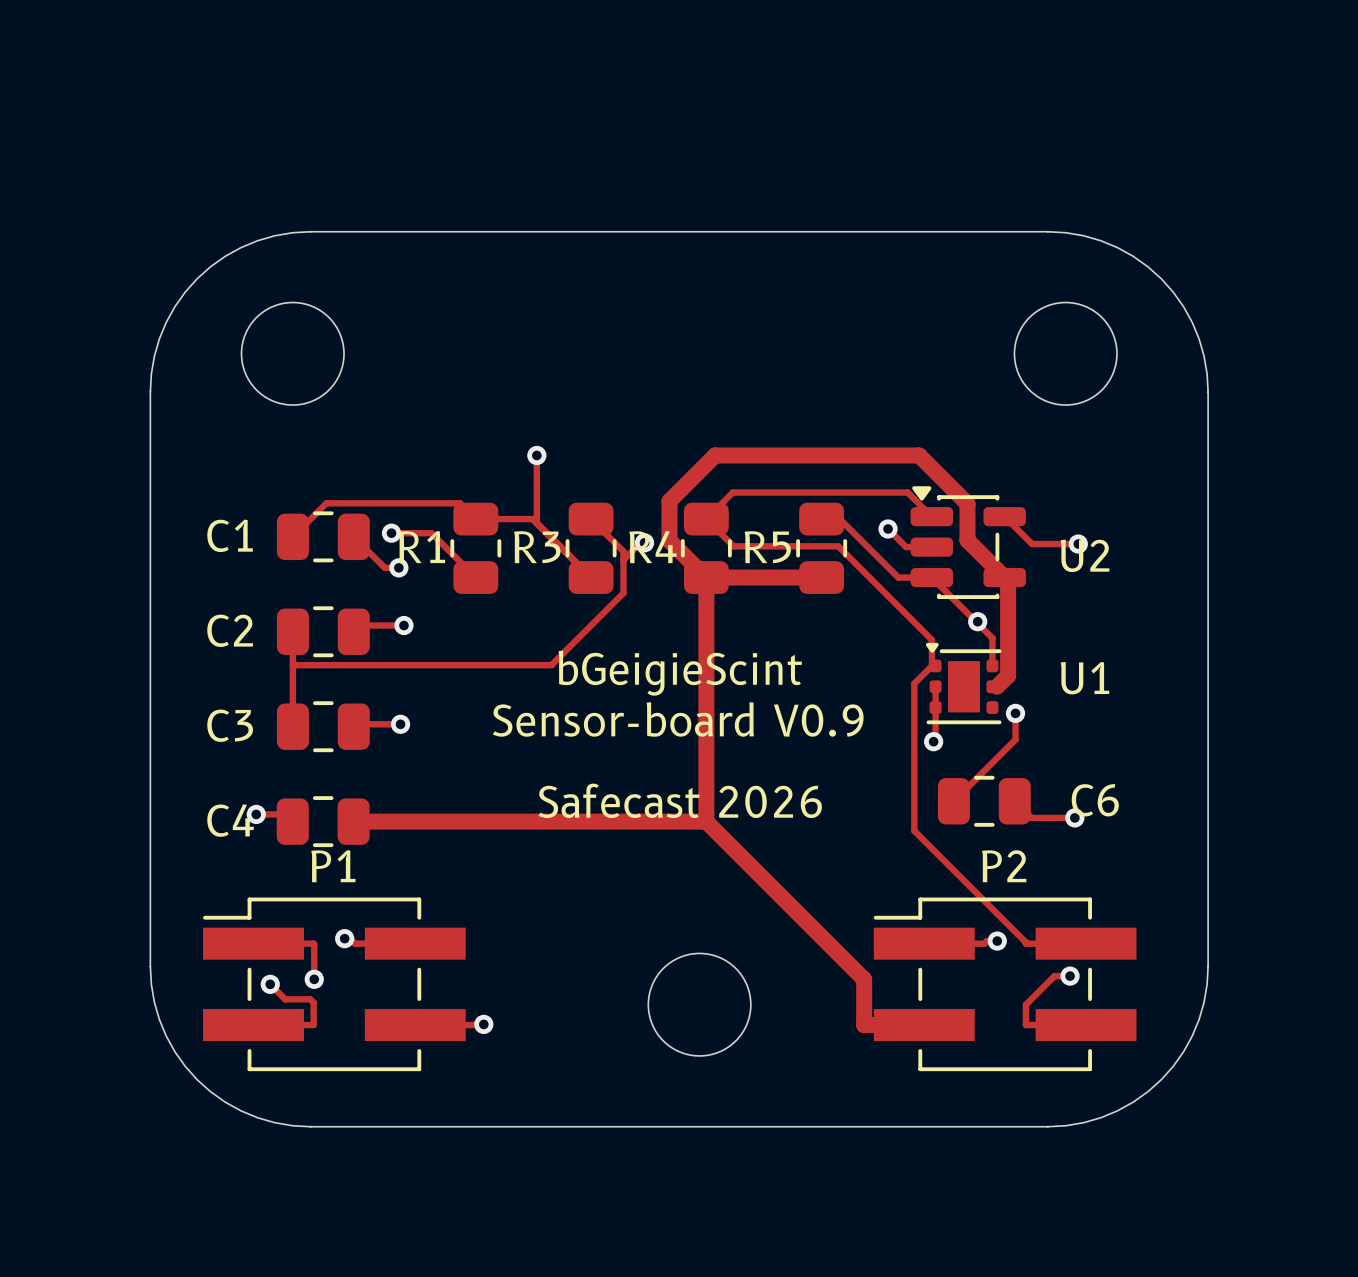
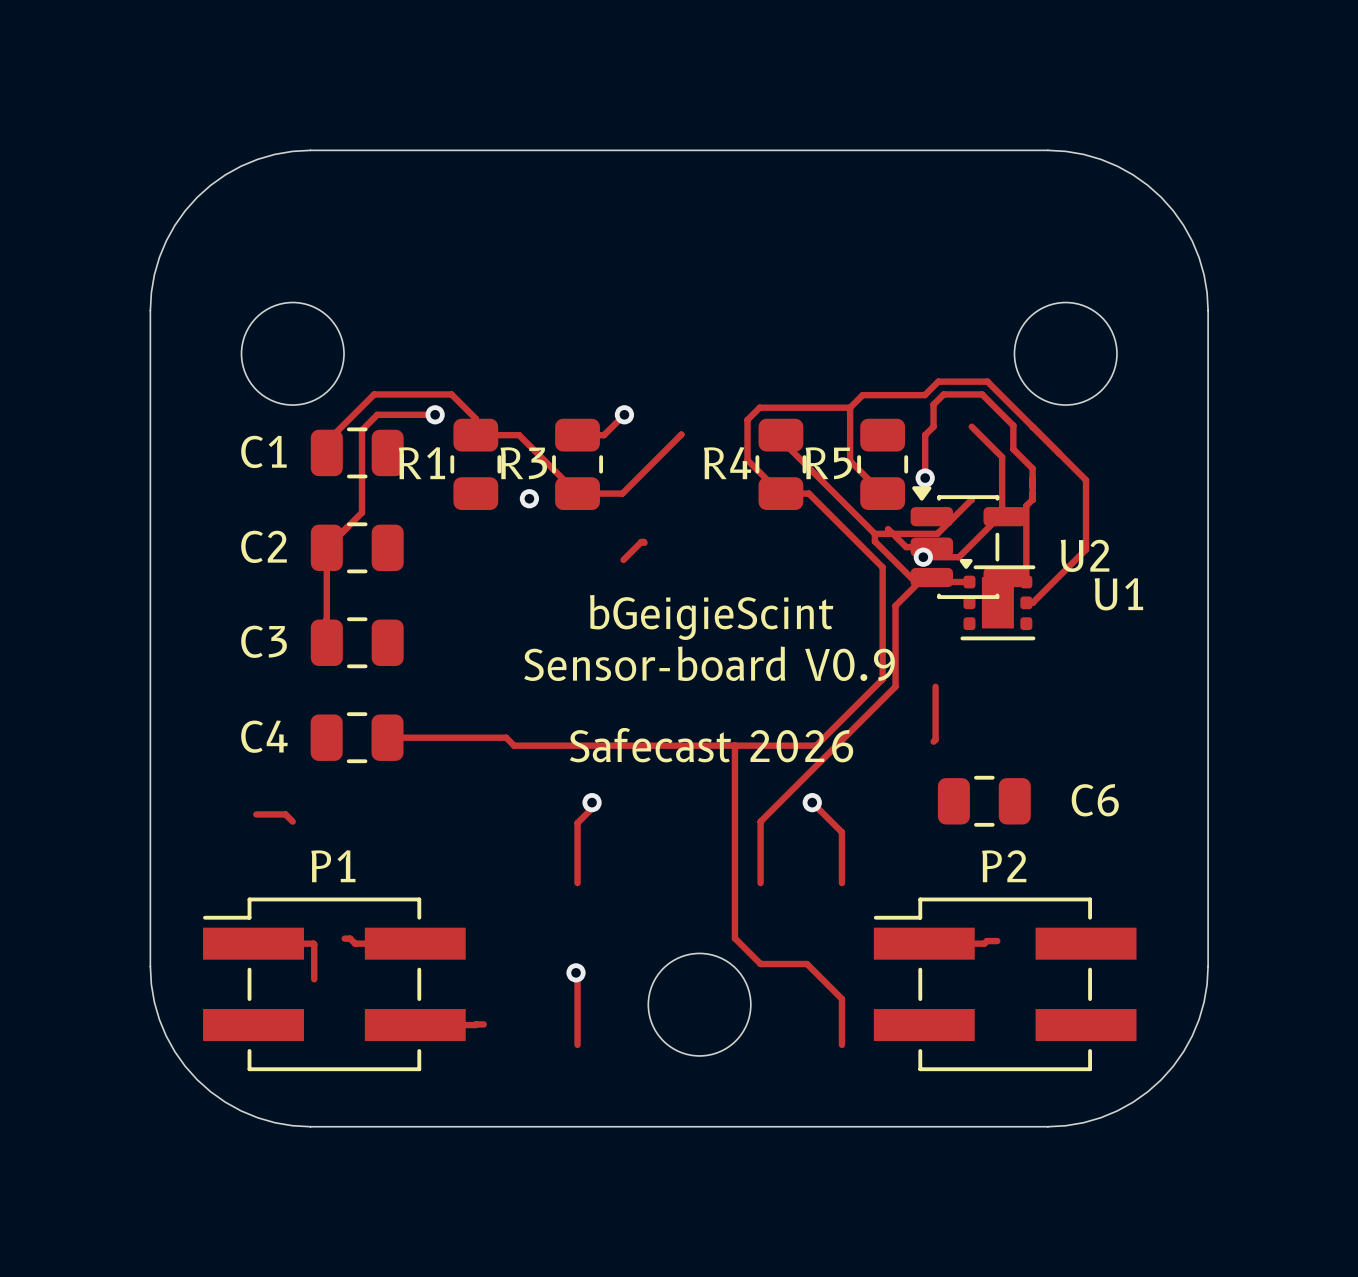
board edge: (150, 391) (154, 356) (166, 322) (185, 292) (197, 278) (210, 266) (241, 247) (274, 235) (310, 231) (1047, 231) (1083, 235) (1117, 247) (1133, 256) (1147, 266) (1173, 292) (1192, 322) (1199, 339) (1207, 373) (1208, 391) -> (150, 391) (151, 292) (159, 257) (174, 225) (197, 197) (225, 174) (241, 166) (274, 154) (310, 150) (1047, 150) (1083, 154) (1117, 166) (1147, 185) (1173, 210) (1192, 241) (1199, 257) (1207, 292) (1208, 391)
track: none -> (850, 407) (850, 461) (882, 493)
track: none -> (850, 407) (759, 407) (747, 419) (747, 460) (780, 493) (808, 493) (882, 567) (882, 679) (816, 745) (514, 745) (506, 737) (387, 737)
track: none -> (850, 407) (862, 395) (924, 395) (938, 381) (987, 381) (1059, 453)
track: none -> (435, 414) (377, 414) (362, 430) (362, 512) (326, 547) (326, 642)
via: none -> (435, 414)
track: none -> (624, 414) (604, 435) (577, 435)
via: none -> (624, 414)
track: none -> (971, 426) (1002, 457) (1002, 513) (958, 557) (923, 557)
track: none -> (1032, 426) (1086, 480) (1086, 549) (1032, 602) (1026, 602)
track: none -> (681, 434) (622, 493) (577, 493) (519, 435) (475, 435) (475, 418) (451, 394) (374, 394) (326, 441) (326, 452)
track: none -> (780, 435) (780, 439) (874, 533)
track: (536, 455) (536, 523) -> none
via position: (536, 455) -> (529, 498)
track: none -> (925, 478) (925, 435) (933, 426) (933, 404) (943, 394) (982, 394) (1013, 425) (1013, 449) (1032, 468) (1032, 499) (1026, 505) (1026, 582)
via: none -> (925, 478)
track: none -> (971, 499) (937, 533) (874, 533)
track: (931, 516) (907, 492) (732, 492) (706, 519) (733, 546) (838, 546) (931, 640) (931, 665) -> none
track: (1004, 516) (1032, 544) (1078, 544) -> none
track: (591, 519) (623, 551) (623, 593) (551, 665) (292, 665) -> none
track: (821, 519) (839, 519) (898, 577) (931, 577) (992, 638) (992, 665) -> none
via: (888, 528) -> none
track: (391, 533) (431, 533) (475, 577) -> none
via: (391, 533) -> none
track: none -> (874, 533) (874, 541) (915, 582) (969, 582)
track: (292, 536) (326, 503) (460, 503) (475, 519) (532, 519) (591, 577) -> none
C1 position: (323, 536) -> (357, 452)
track: (353, 536) (384, 567) (398, 567) -> none
via: (644, 542) -> none
via: (1078, 544) -> none
R1 position: (475, 548) -> (475, 464)
R3 position: (591, 548) -> (577, 464)
R4 position: (706, 548) -> (780, 464)
R5 position: (821, 548) -> (882, 464)
via: none -> (923, 557)
via: (398, 567) -> none
track: (706, 577) (669, 540) (669, 501) (715, 455) (919, 455) (967, 503) (967, 540) (1008, 580) (1008, 675) (996, 686) (992, 686) -> none
track: (706, 577) (706, 821) -> none
track: (706, 577) (821, 577) -> none
track: none -> (917, 582) (895, 605) (895, 686) (760, 821) (760, 883)
via: (977, 621) -> none
track: (403, 625) (360, 625) (353, 631) -> none
via: (403, 625) -> none
track: (292, 631) (292, 726) -> none
C2 position: (323, 631) -> (357, 547)
track: (931, 665) (914, 683) (914, 830) (1025, 943) (1086, 943) -> none
text position: bGeigieScint (680, 673) -> bGeigieScint (711, 617)
U1 position: (963, 683) -> (997, 599)
track: (1015, 713) (1015, 739) (953, 801) -> none
via: (1015, 713) -> none
text position: Sensor-board V0.9 (678, 719) -> Sensor-board V0.9 (709, 663)
track: (400, 724) (356, 724) (353, 726) -> none
via: (400, 724) -> none
C3 position: (323, 726) -> (357, 642)
via: (933, 741) -> none
track: none -> (734, 745) (734, 938) (760, 964) (807, 964) (841, 998) (841, 1044)
text position: Safecast 2026 (680, 800) -> Safecast 2026 (711, 745)
track: (1014, 801) (1031, 817) (1074, 817) -> none
track: none -> (592, 802) (592, 808) (577, 823) (577, 883)
via: none -> (592, 802)
track: none -> (812, 802) (841, 832) (841, 883)
via: none -> (812, 802)
via: (256, 814) -> none
via: (1074, 817) -> none
C4 position: (323, 821) -> (357, 737)
track: (353, 821) (706, 821) -> none
track: (706, 821) (864, 979) (864, 1025) (924, 1025) -> none
via: (344, 938) -> none
via: (997, 941) -> none
track: none -> (576, 972) (577, 1044)
track: (1070, 976) (1054, 976) (1025, 1004) (1025, 1025) (1086, 1025) -> none
via: (1070, 976) -> none
via: (314, 979) -> none
track: (270, 984) (285, 999) (310, 999) (313, 1002) (313, 1025) (253, 1025) -> none
via: (270, 984) -> none
via position: (483, 1024) -> (576, 972)

